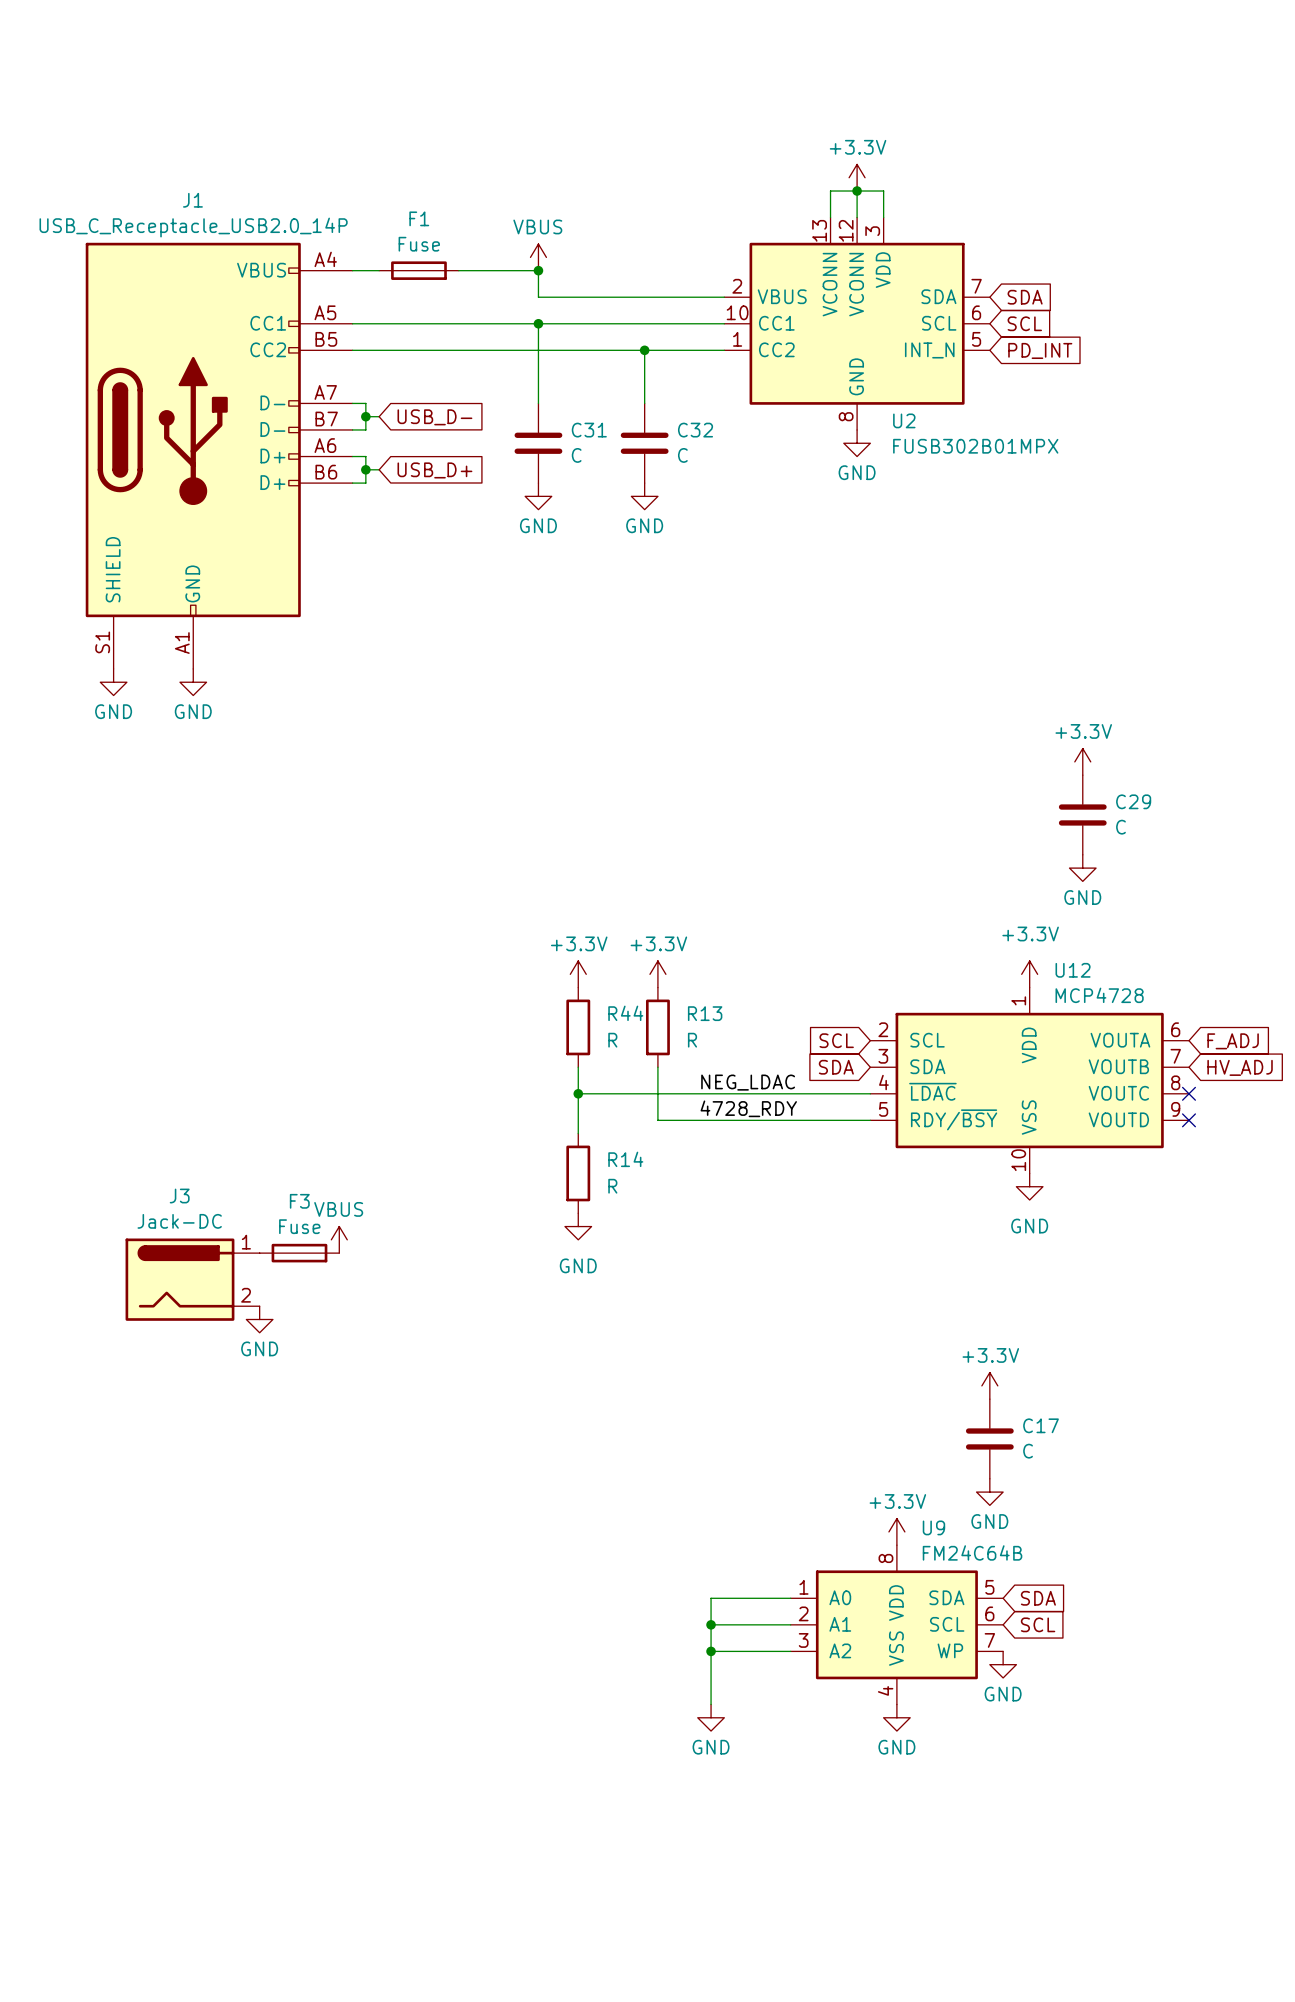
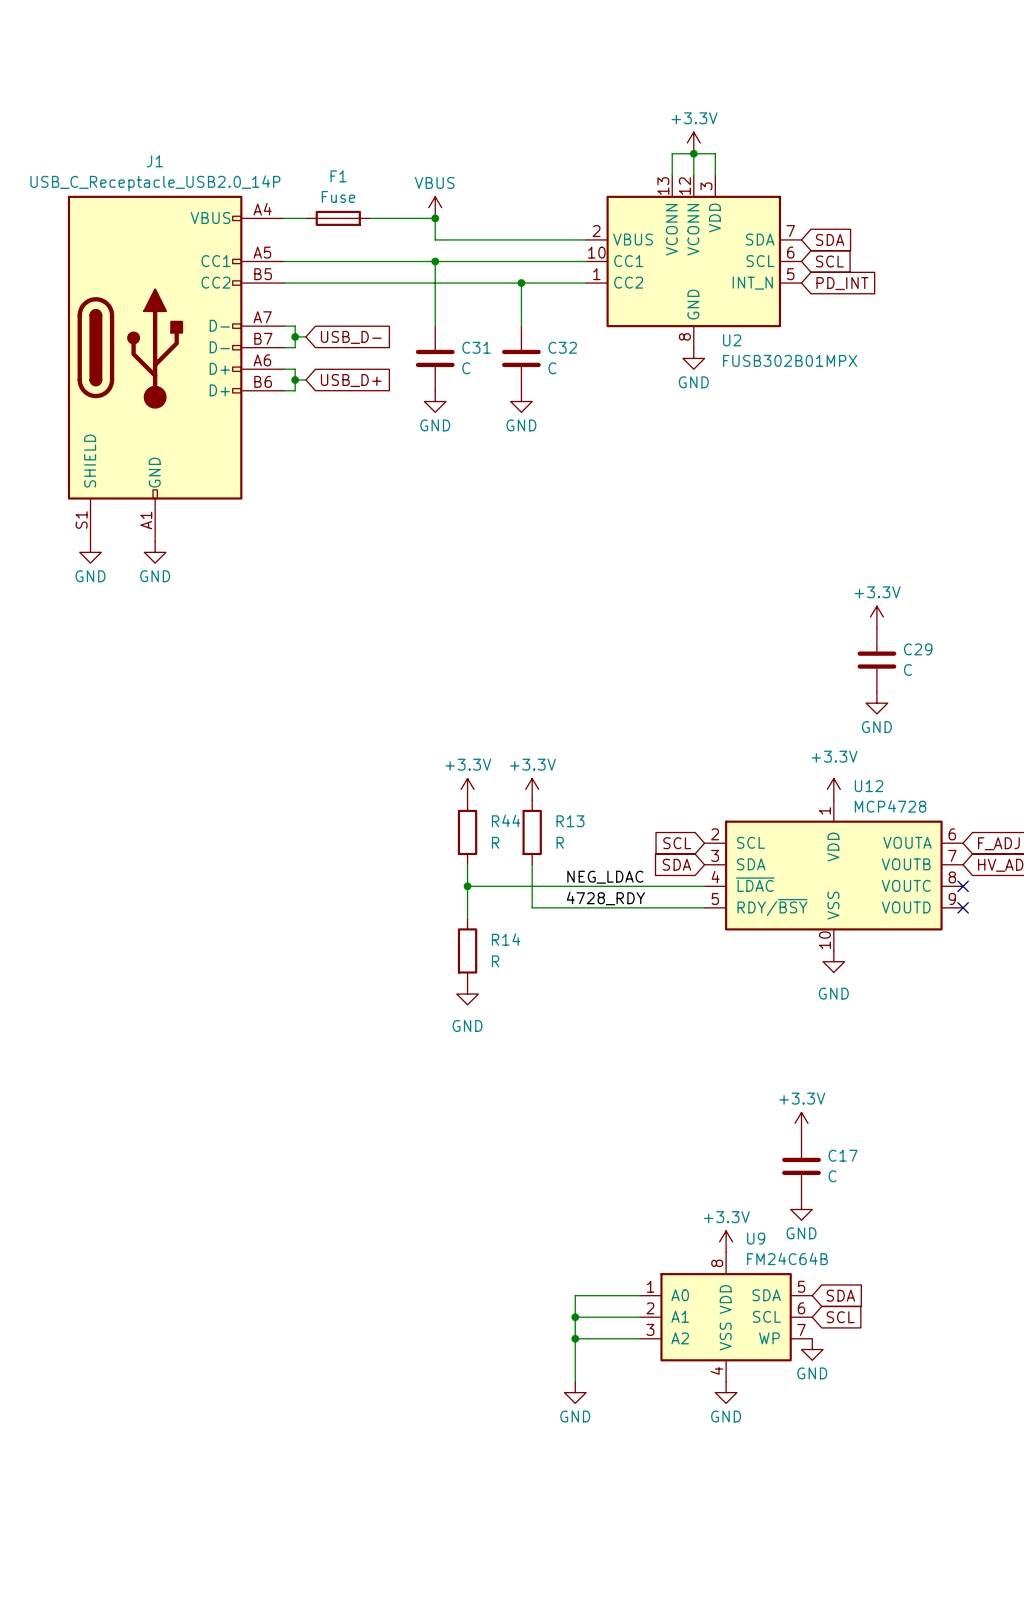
power symbol: VBUS (339, 1239) -> none
F3: Fuse (299, 1253) -> none
J3: Jack-DC (192, 1279) -> none
power symbol: GND (259, 1319) -> none

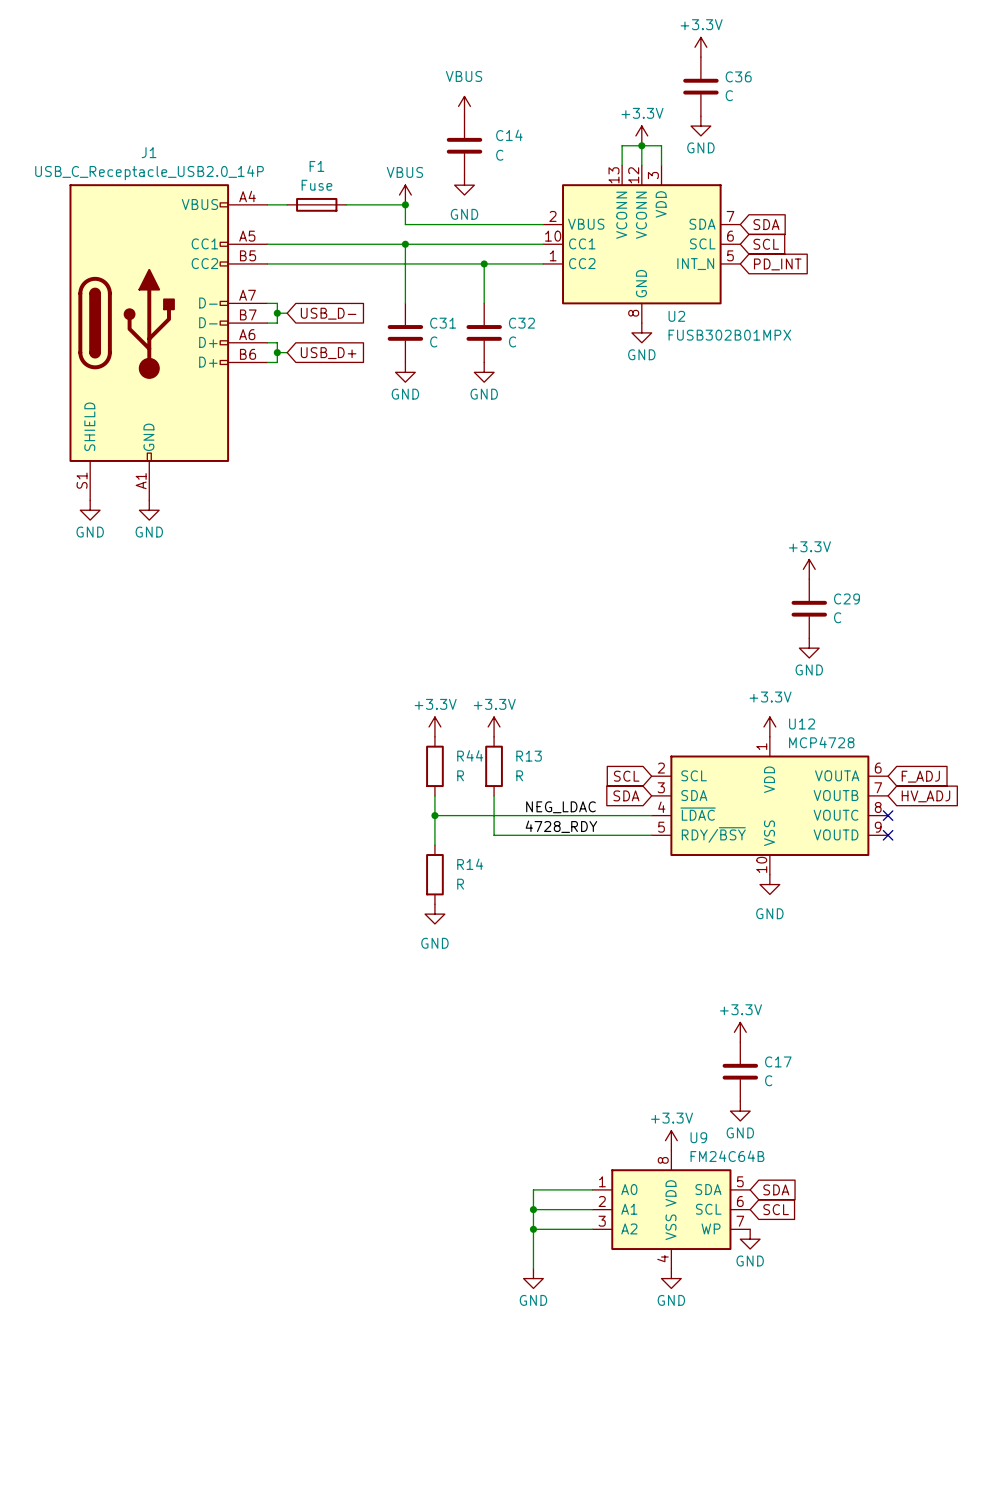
power symbol: none -> +3.3V (700, 47)
C36: none -> C (700, 86)
power symbol: none -> VBUS (464, 106)
power symbol: none -> GND (700, 126)
C14: none -> C (464, 145)
power symbol: none -> GND (464, 185)

